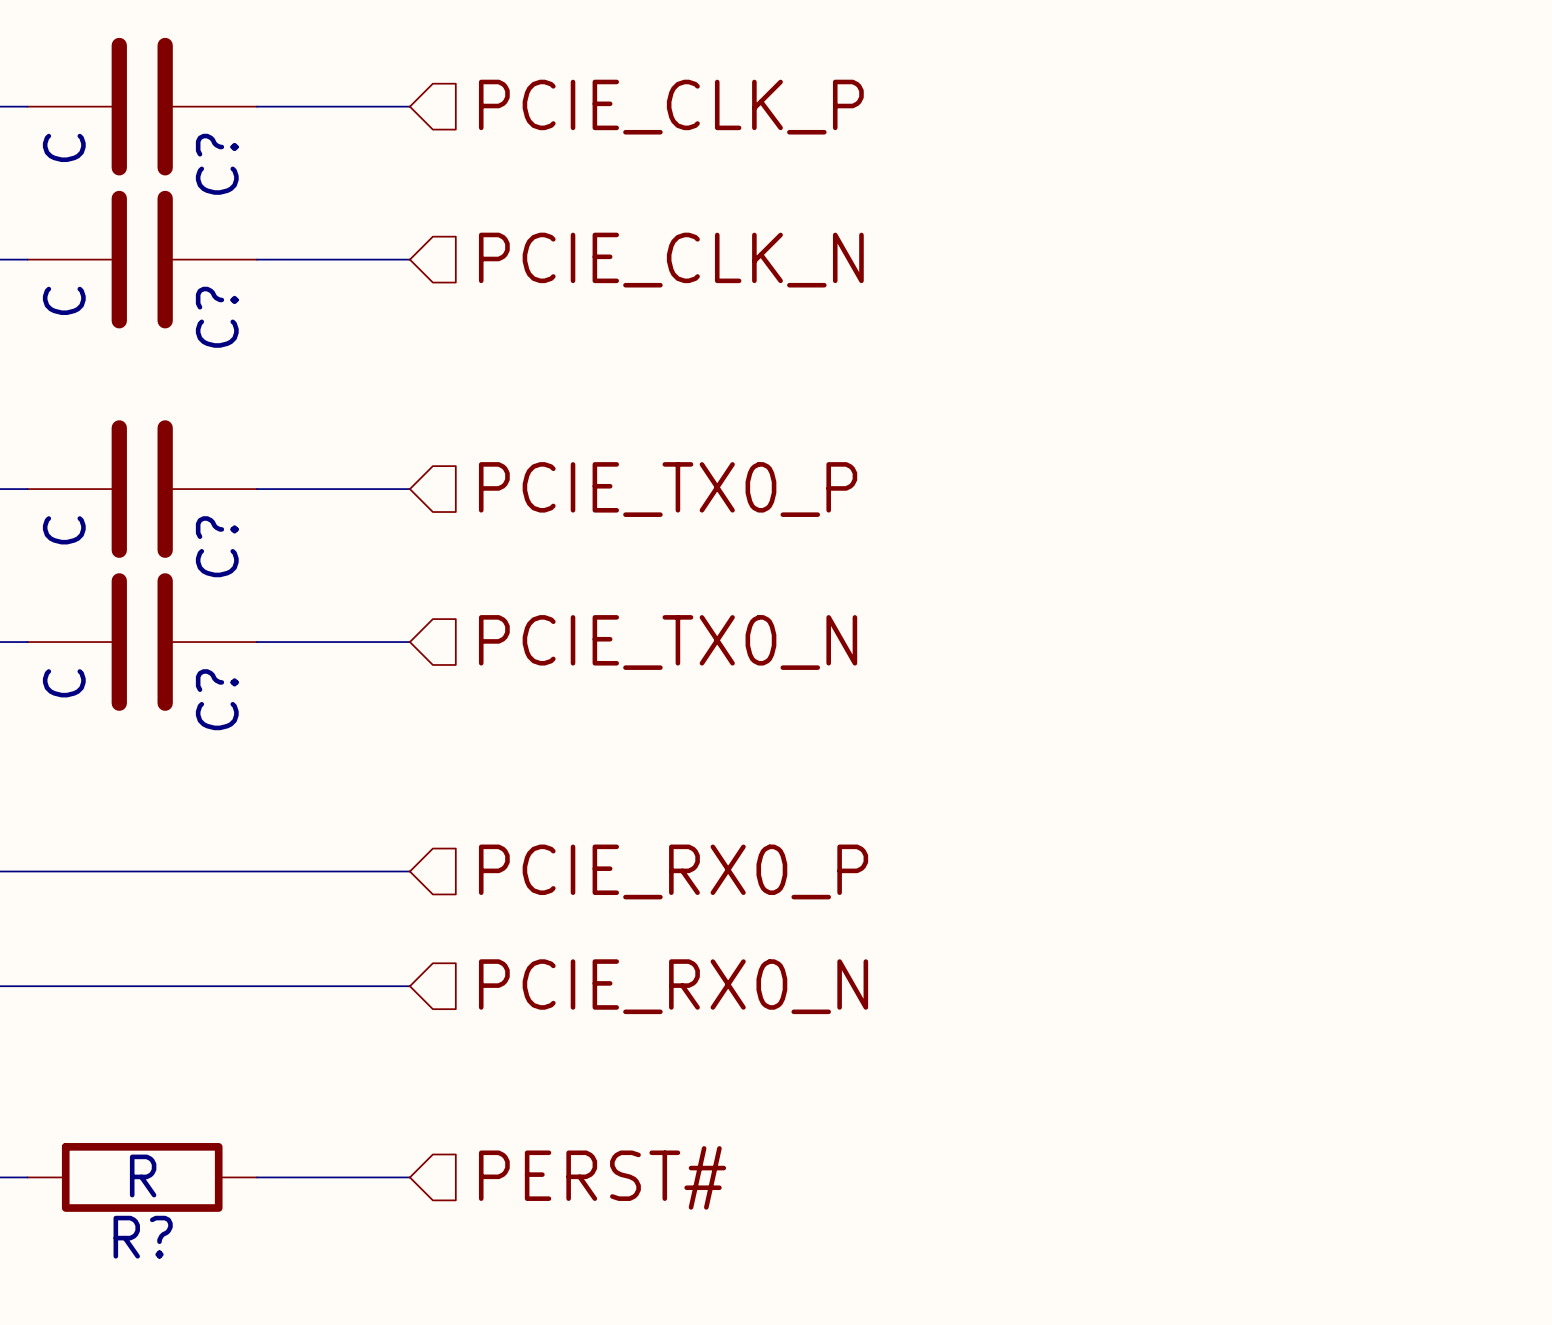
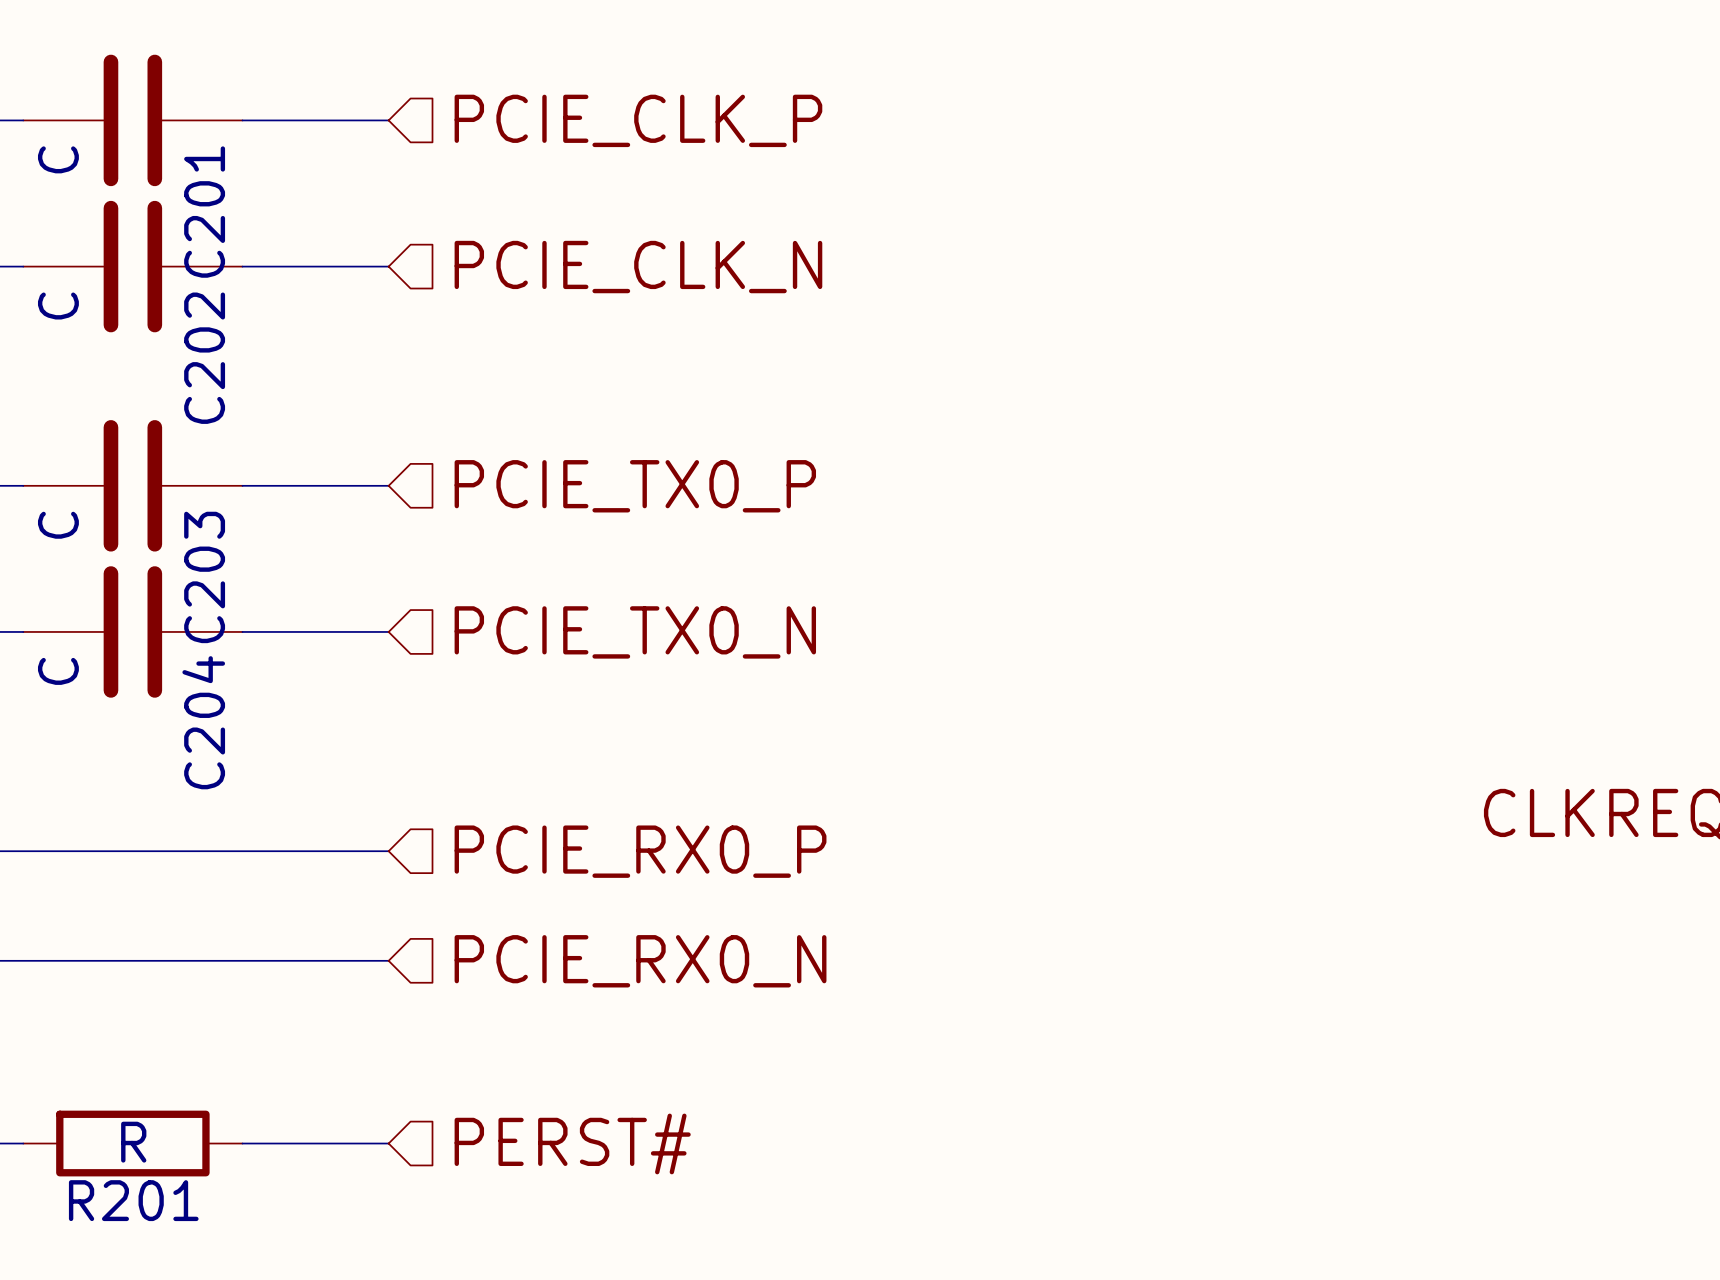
C? name: C? (217, 164) -> C201 (204, 212)
C? name: C? (217, 317) -> C202 (204, 358)
C? name: C? (217, 546) -> C203 (204, 577)
C? name: C? (217, 699) -> C204 (203, 722)
R? name: R? (143, 1237) -> R201 (133, 1200)

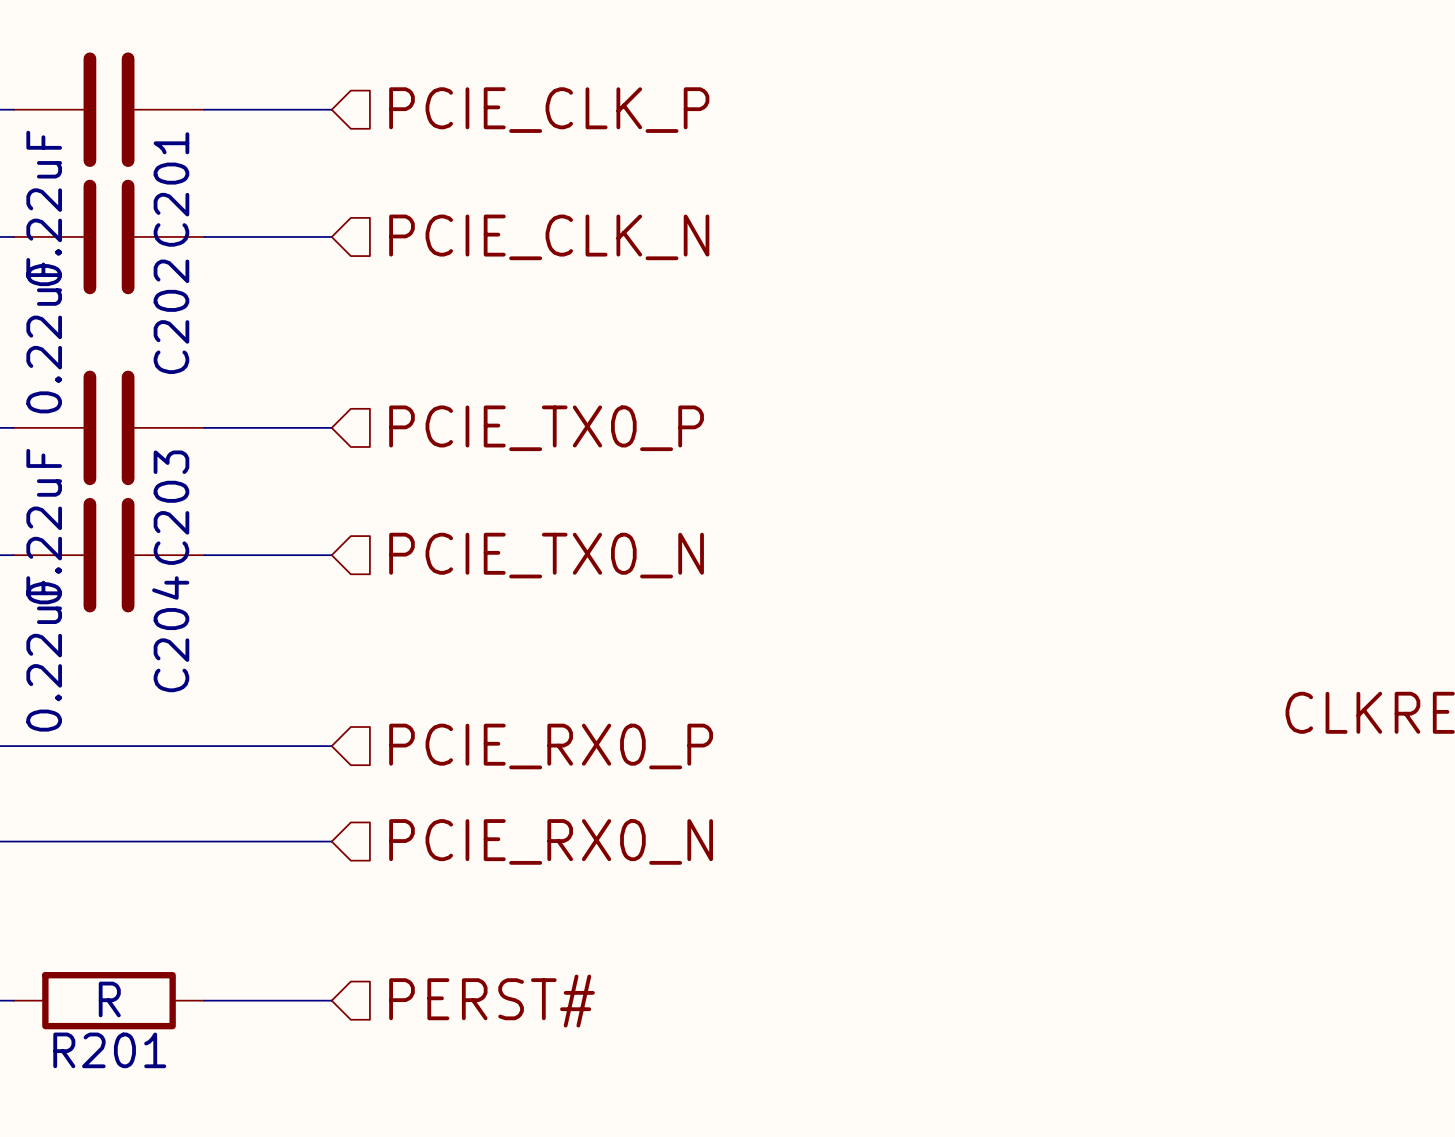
C201 value: C (58, 159) -> 0.22uF (44, 208)
C202 value: C (58, 306) -> 0.22uF (44, 335)
C203 value: C (58, 525) -> 0.22uF (44, 526)
C204 value: C (58, 671) -> 0.22uF (44, 653)

